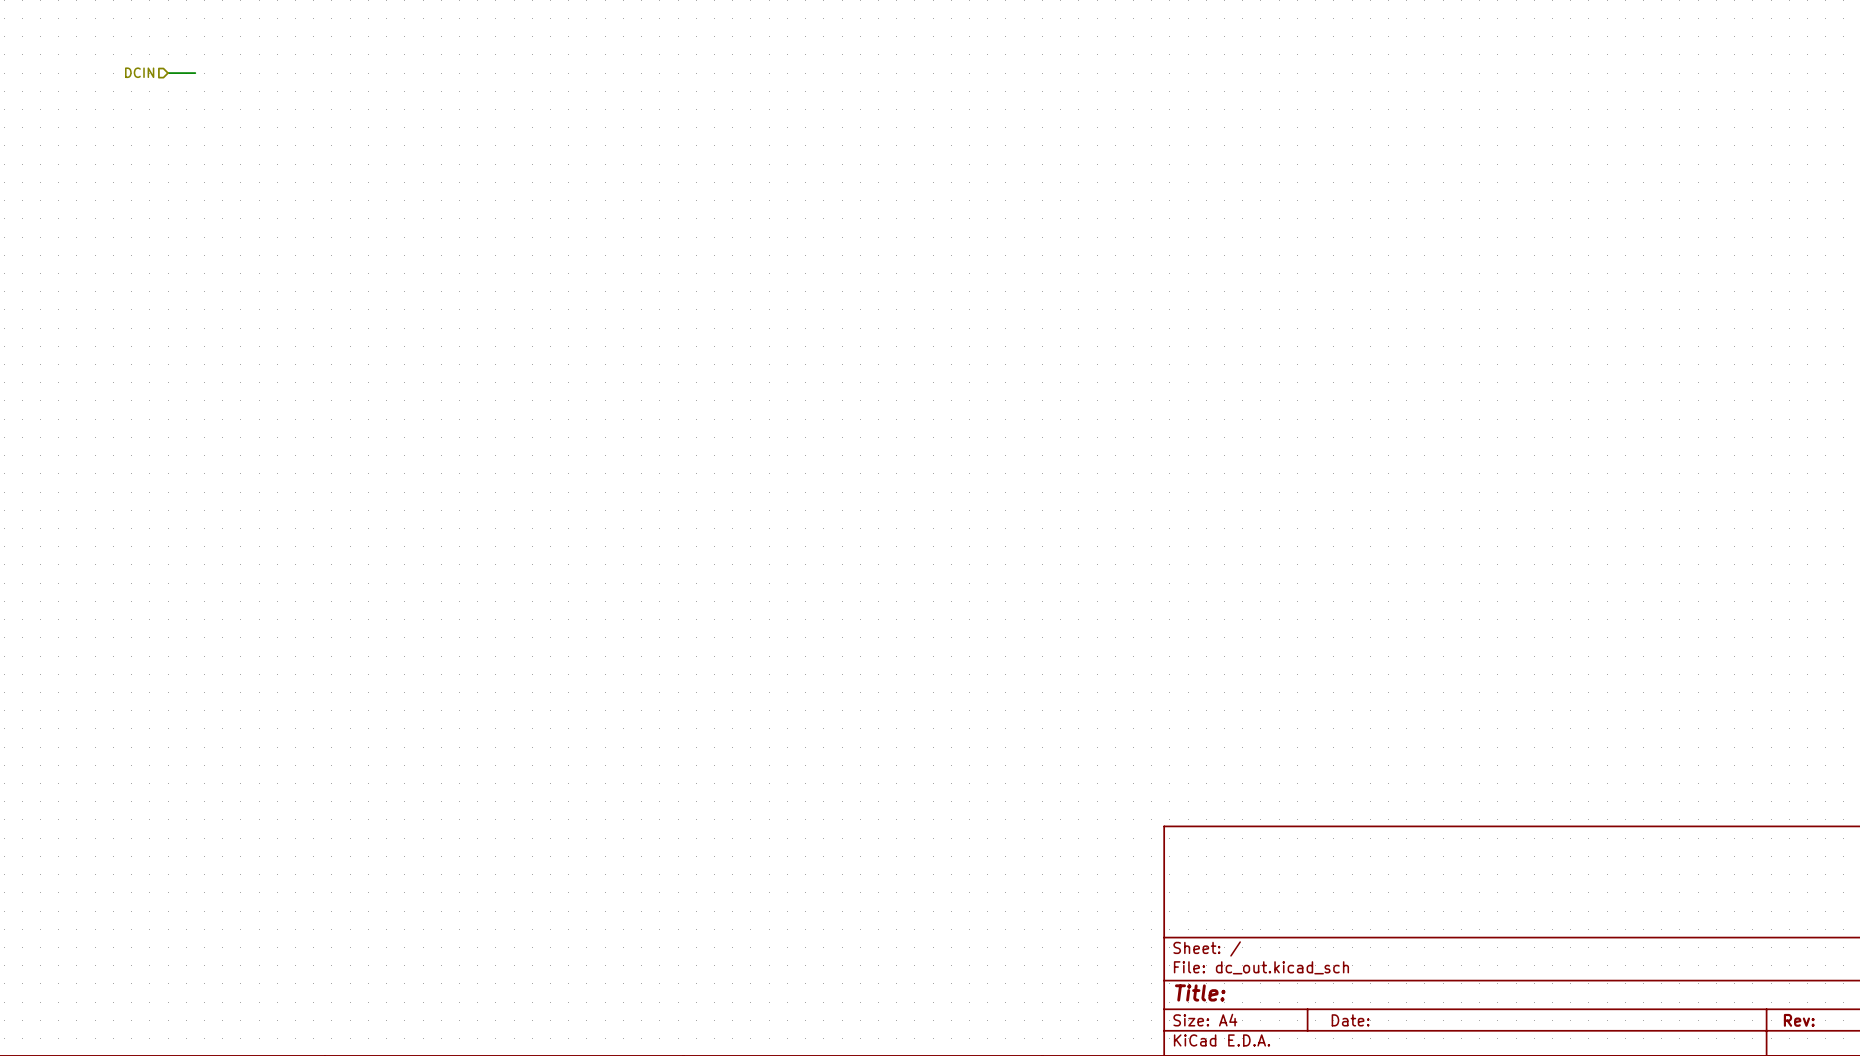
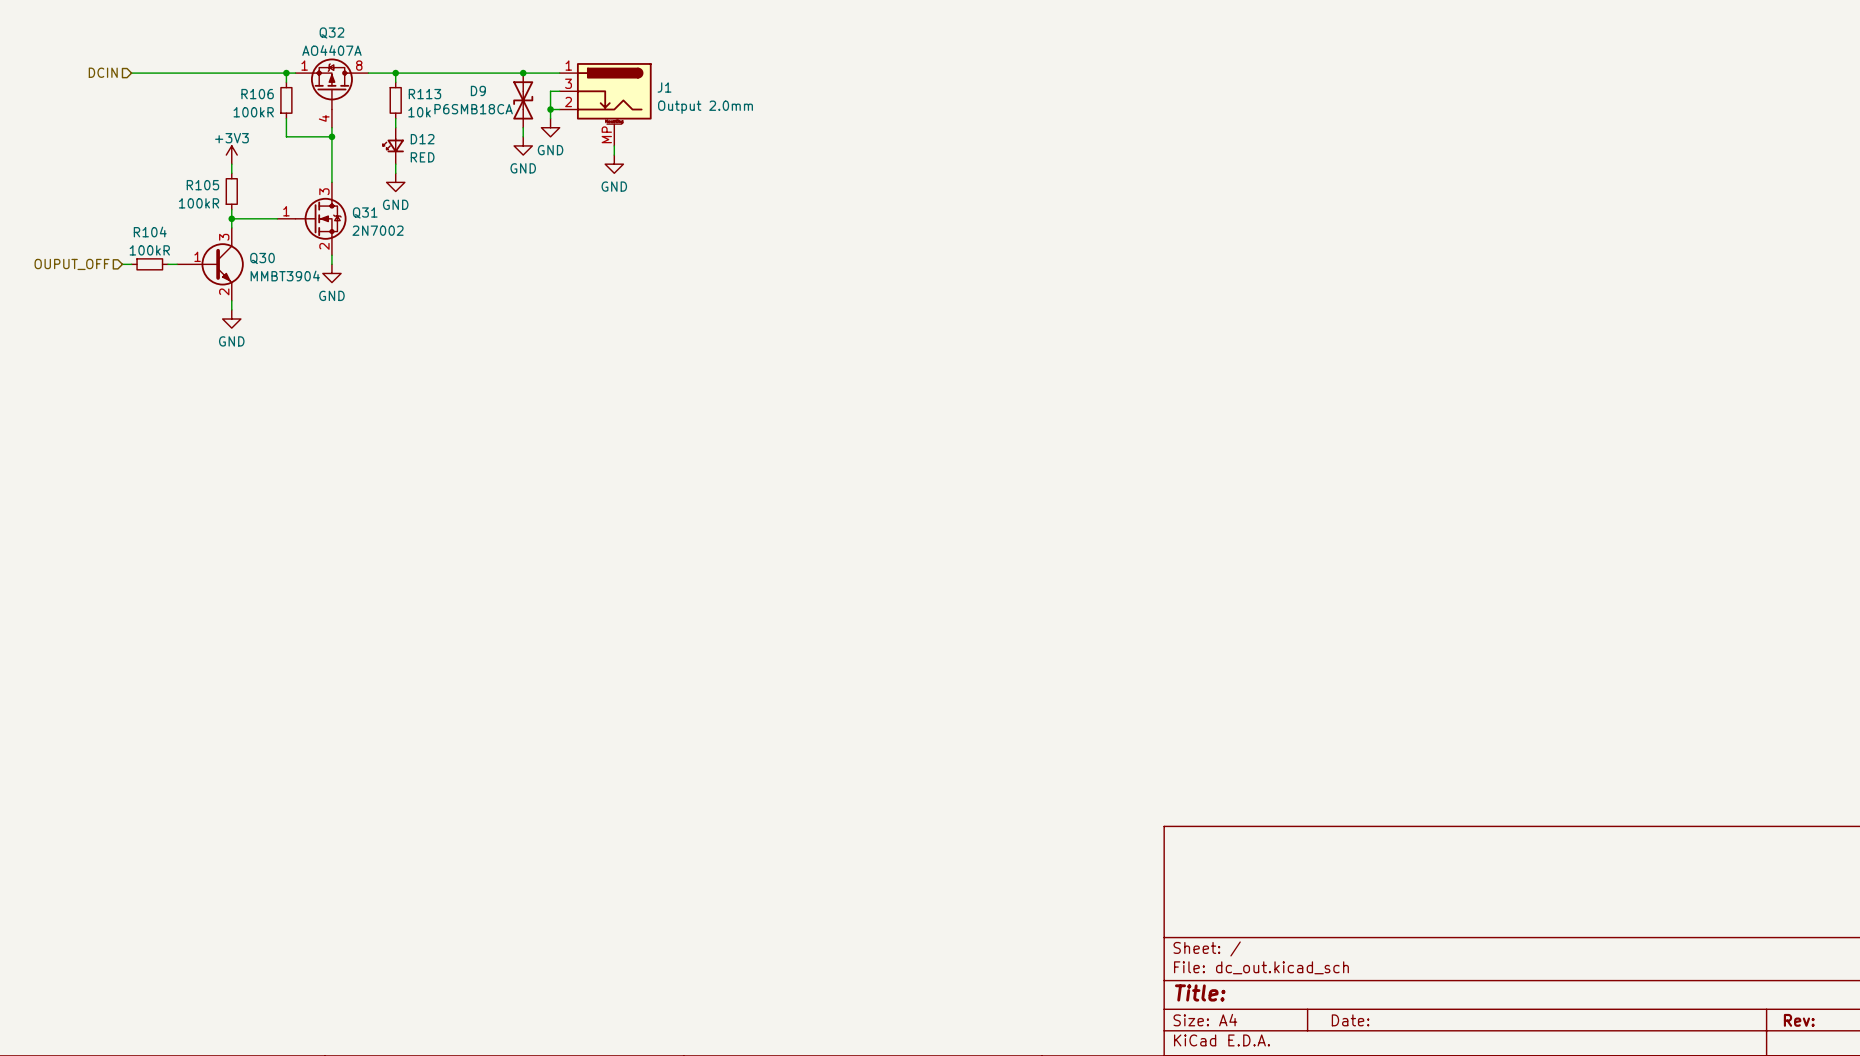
hierarchical label position: DCIN (139, 72) -> DCIN (103, 72)
wire: none -> (131, 73) (168, 73)
wire: none -> (195, 73) (295, 73)
wire: none -> (286, 73) (286, 82)
junction: none -> (286, 73)
wire: none -> (368, 73) (559, 73)
wire: none -> (395, 73) (395, 82)
junction: none -> (395, 73)
junction: none -> (523, 73)
wire: none -> (559, 91) (550, 91) (550, 118)
Q32: none -> AO4407A (331, 93)
R106: none -> 100kR (286, 100)
R113: none -> 10k (395, 100)
D9: none -> P6SMB18CA (523, 100)
J1: none -> Output 2.0mm (605, 104)
wire: none -> (550, 109) (559, 109)
junction: none -> (550, 109)
wire: none -> (286, 118) (286, 136) (331, 136)
wire: none -> (395, 118) (395, 127)
wire: none -> (331, 127) (331, 182)
wire: none -> (523, 127) (523, 136)
power symbol: none -> GND (550, 127)
junction: none -> (331, 136)
D12: none -> RED (393, 145)
power symbol: none -> GND (523, 145)
wire: none -> (614, 145) (614, 155)
power symbol: none -> +3V3 (231, 155)
wire: none -> (231, 164) (231, 173)
wire: none -> (395, 164) (395, 173)
power symbol: none -> GND (614, 164)
power symbol: none -> GND (395, 182)
R105: none -> 100kR (231, 191)
wire: none -> (231, 209) (231, 227)
wire: none -> (231, 218) (277, 218)
junction: none -> (231, 218)
Q31: none -> 2N7002 (311, 218)
wire: none -> (331, 255) (331, 264)
hierarchical label: none -> OUPUT_OFF (72, 264)
wire: none -> (122, 264) (131, 264)
R104: none -> 100kR (149, 264)
wire: none -> (168, 264) (177, 264)
Q30: none -> MMBT3904 (210, 264)
power symbol: none -> GND (331, 273)
wire: none -> (231, 300) (231, 309)
power symbol: none -> GND (231, 319)

